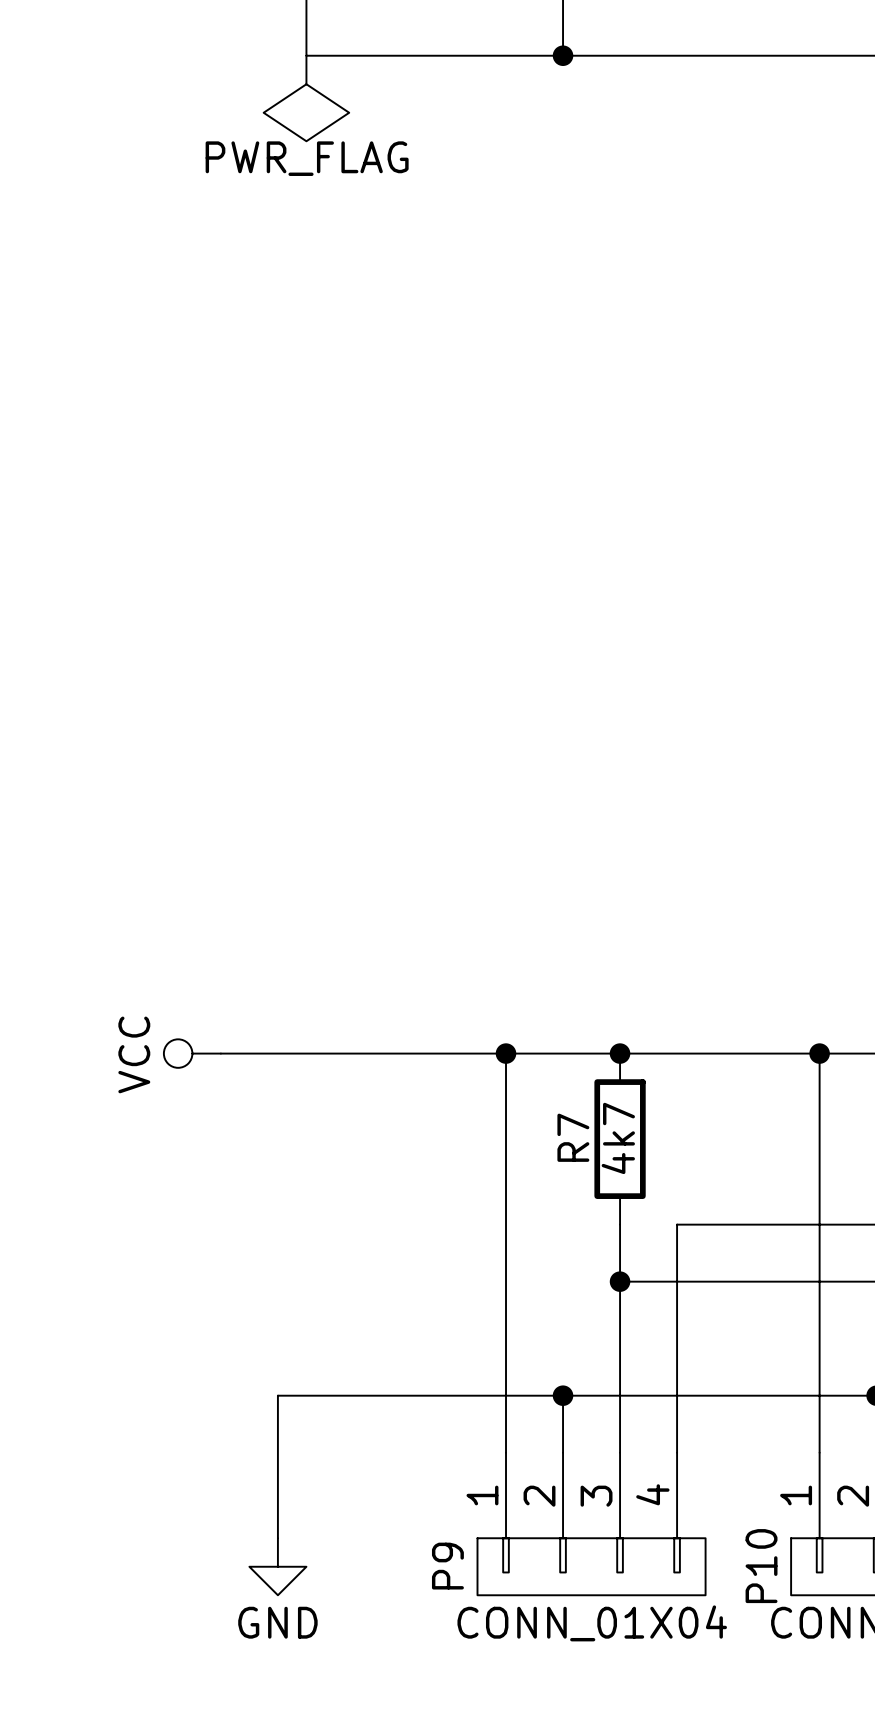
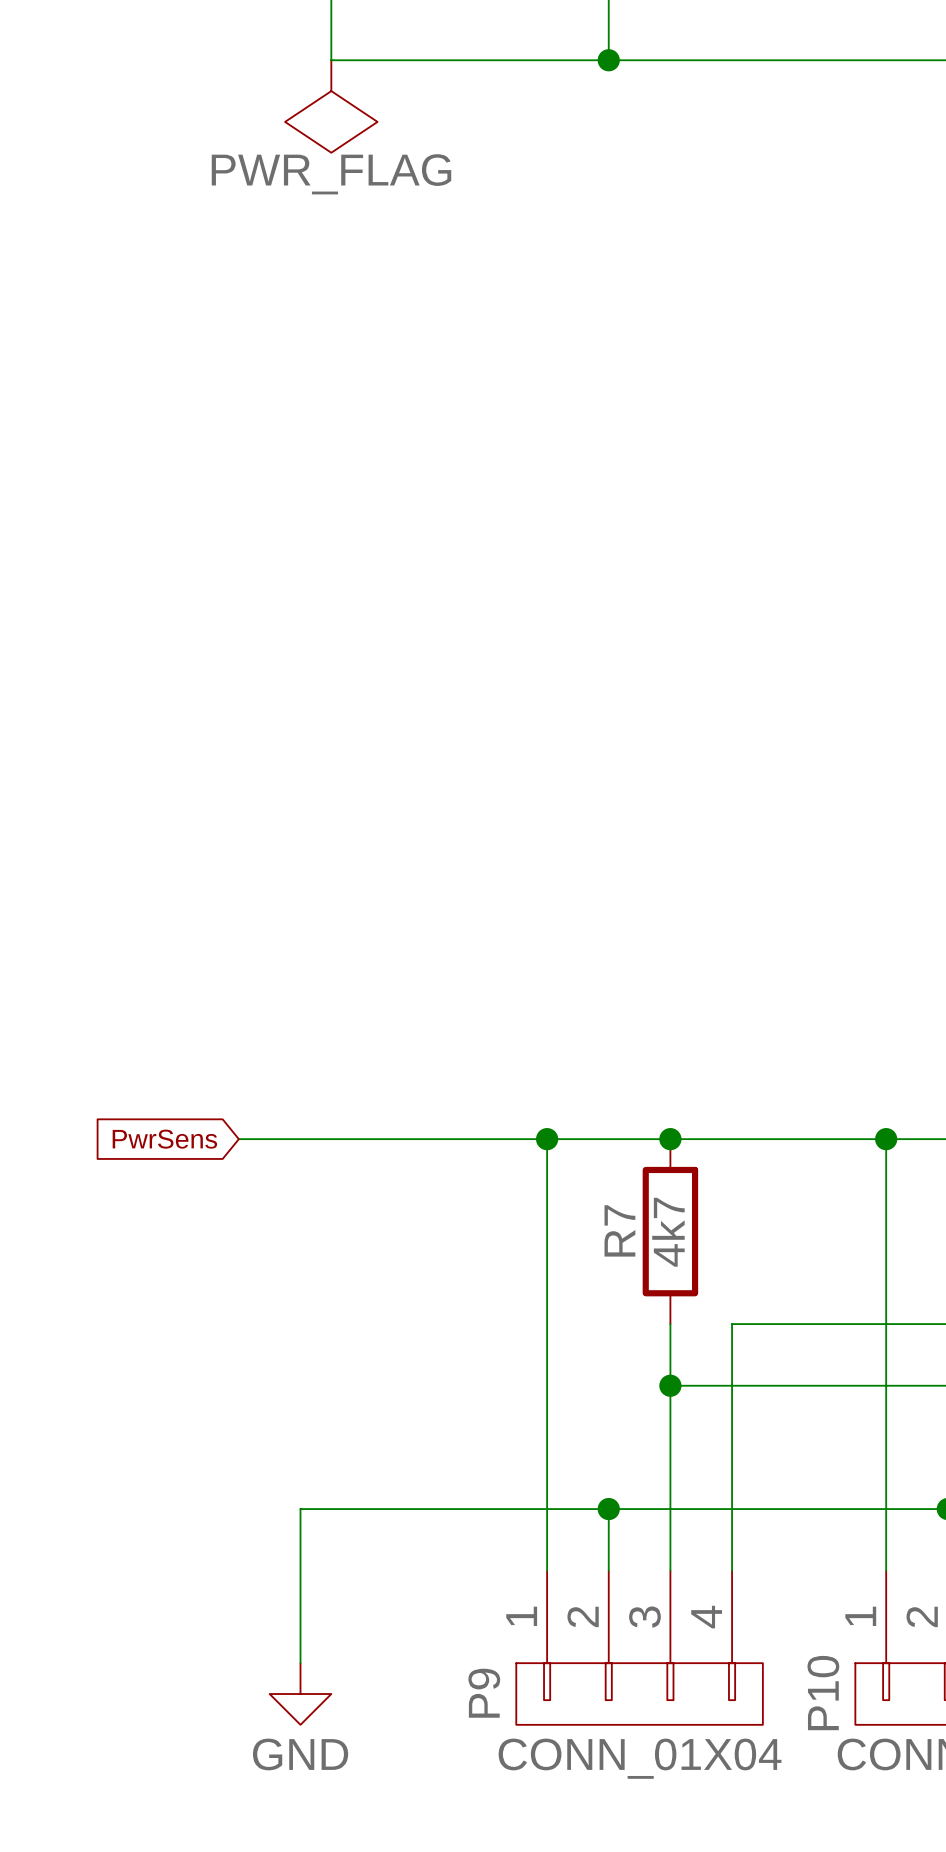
global label: none -> PwrSens (164, 1139)
power symbol: VCC (192, 1053) -> none

